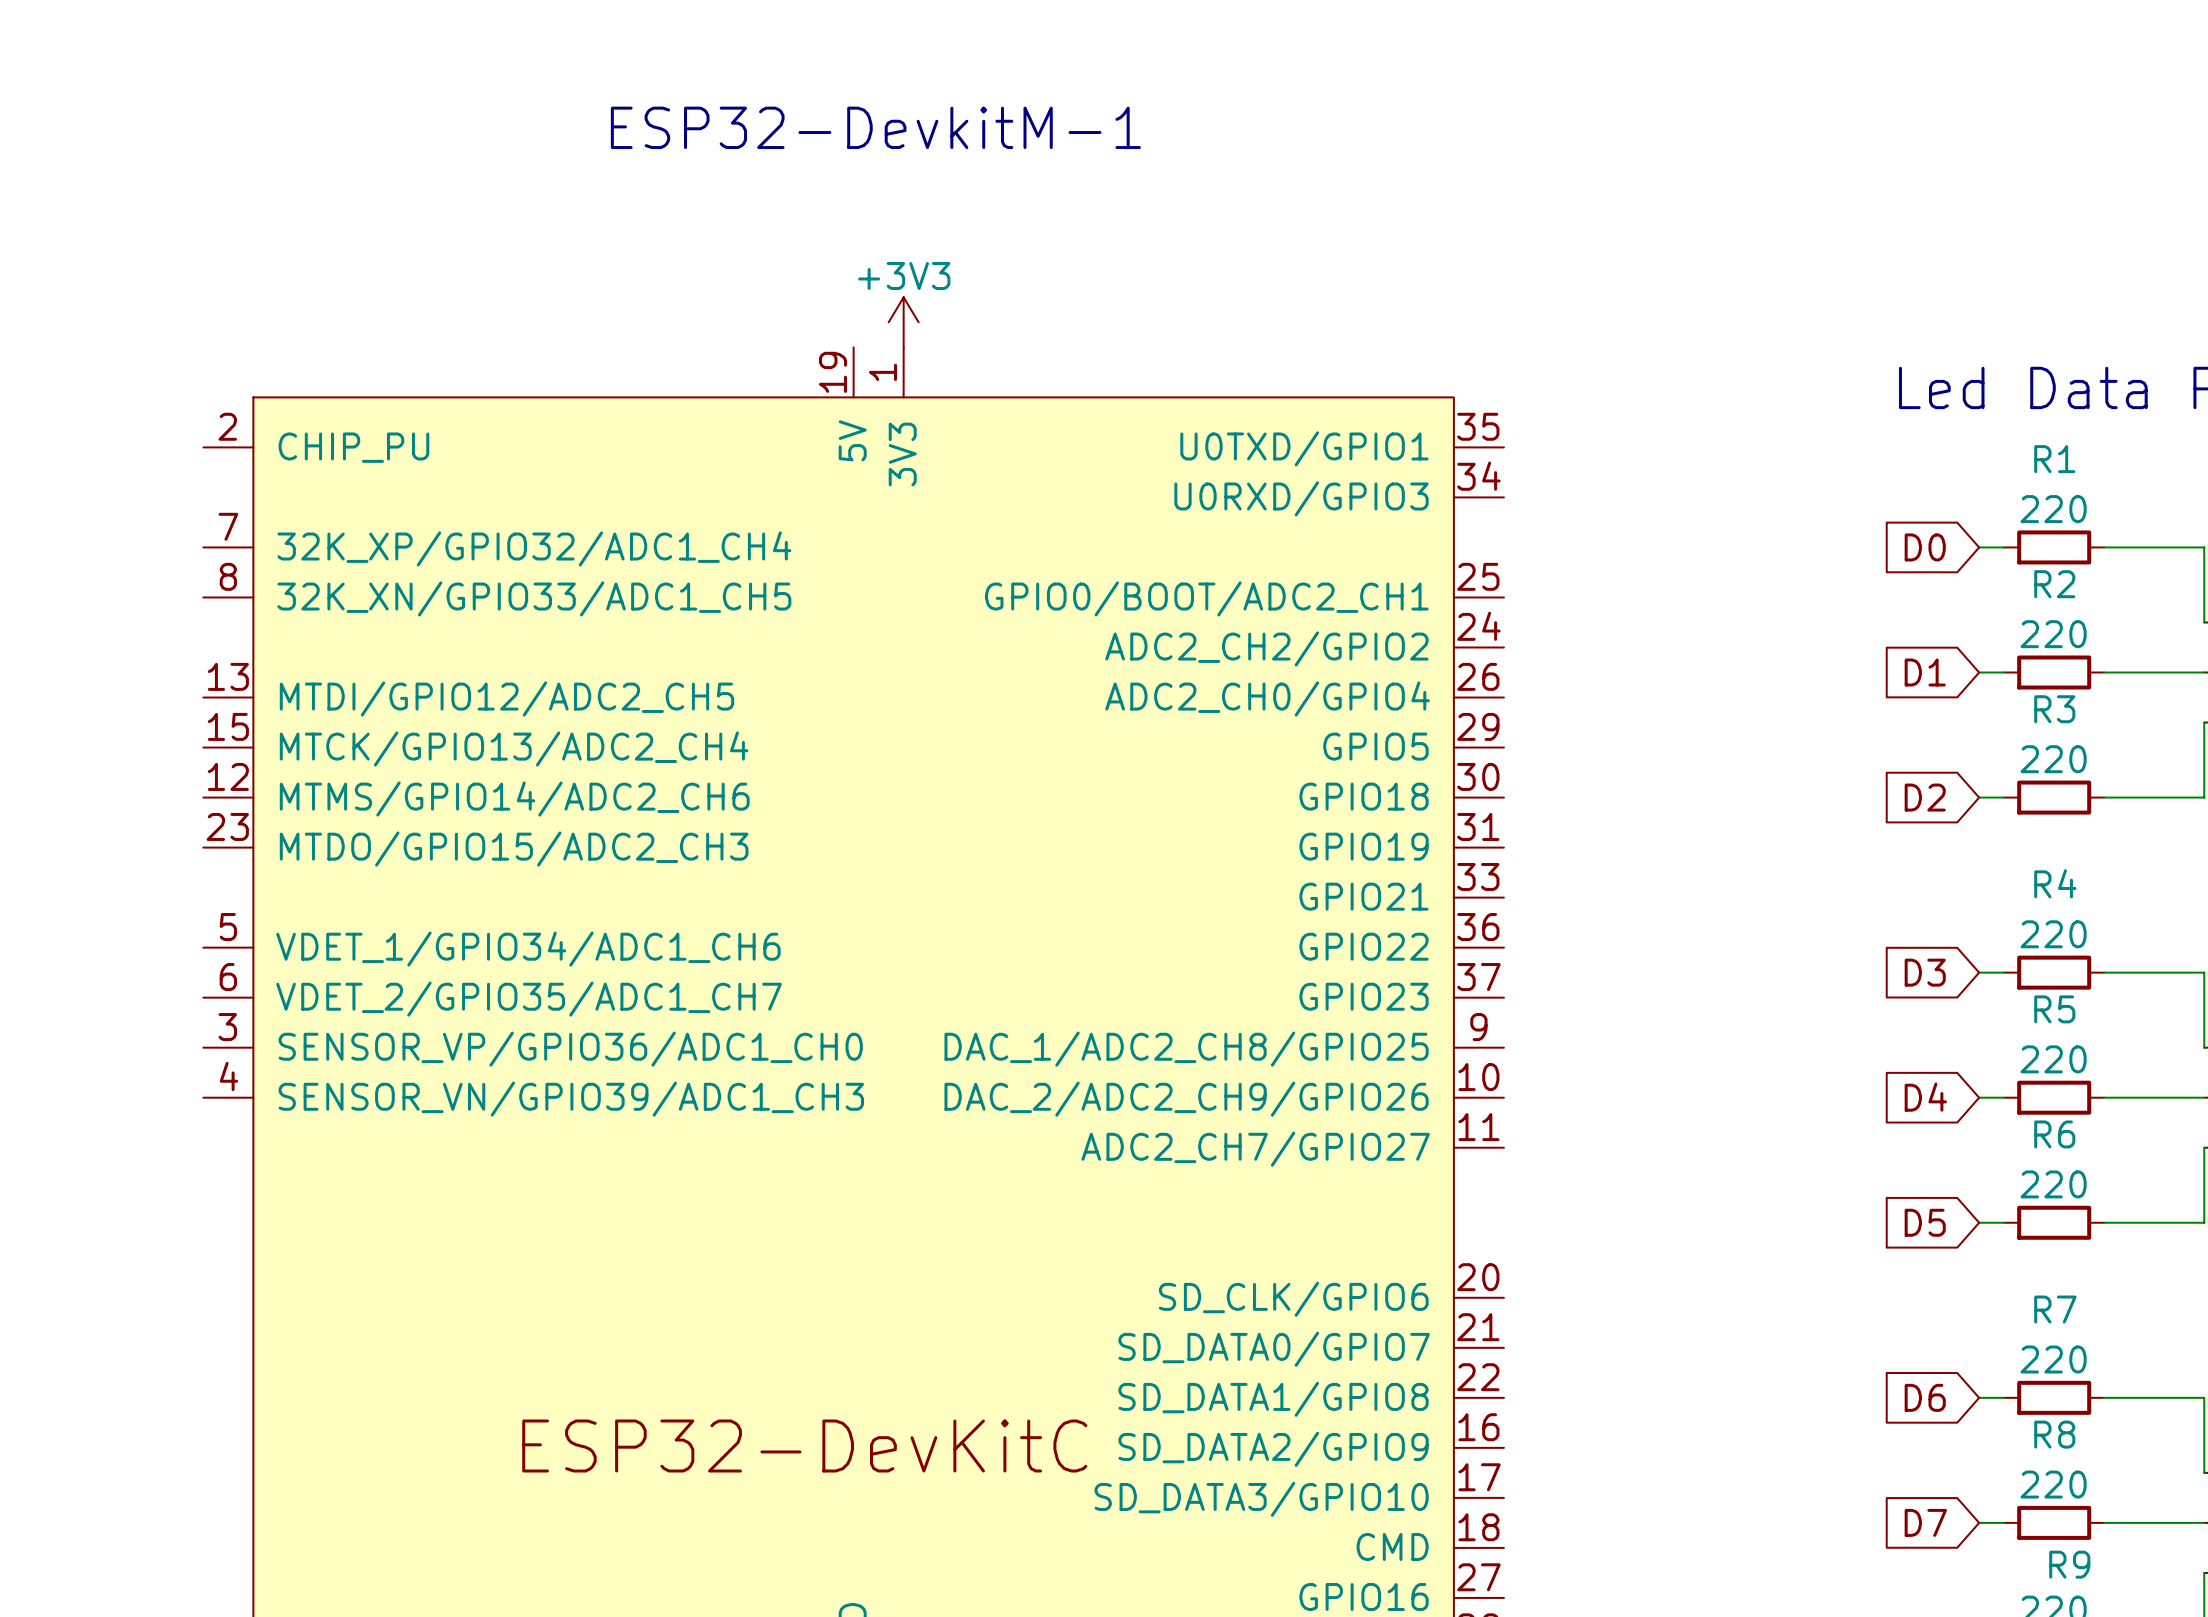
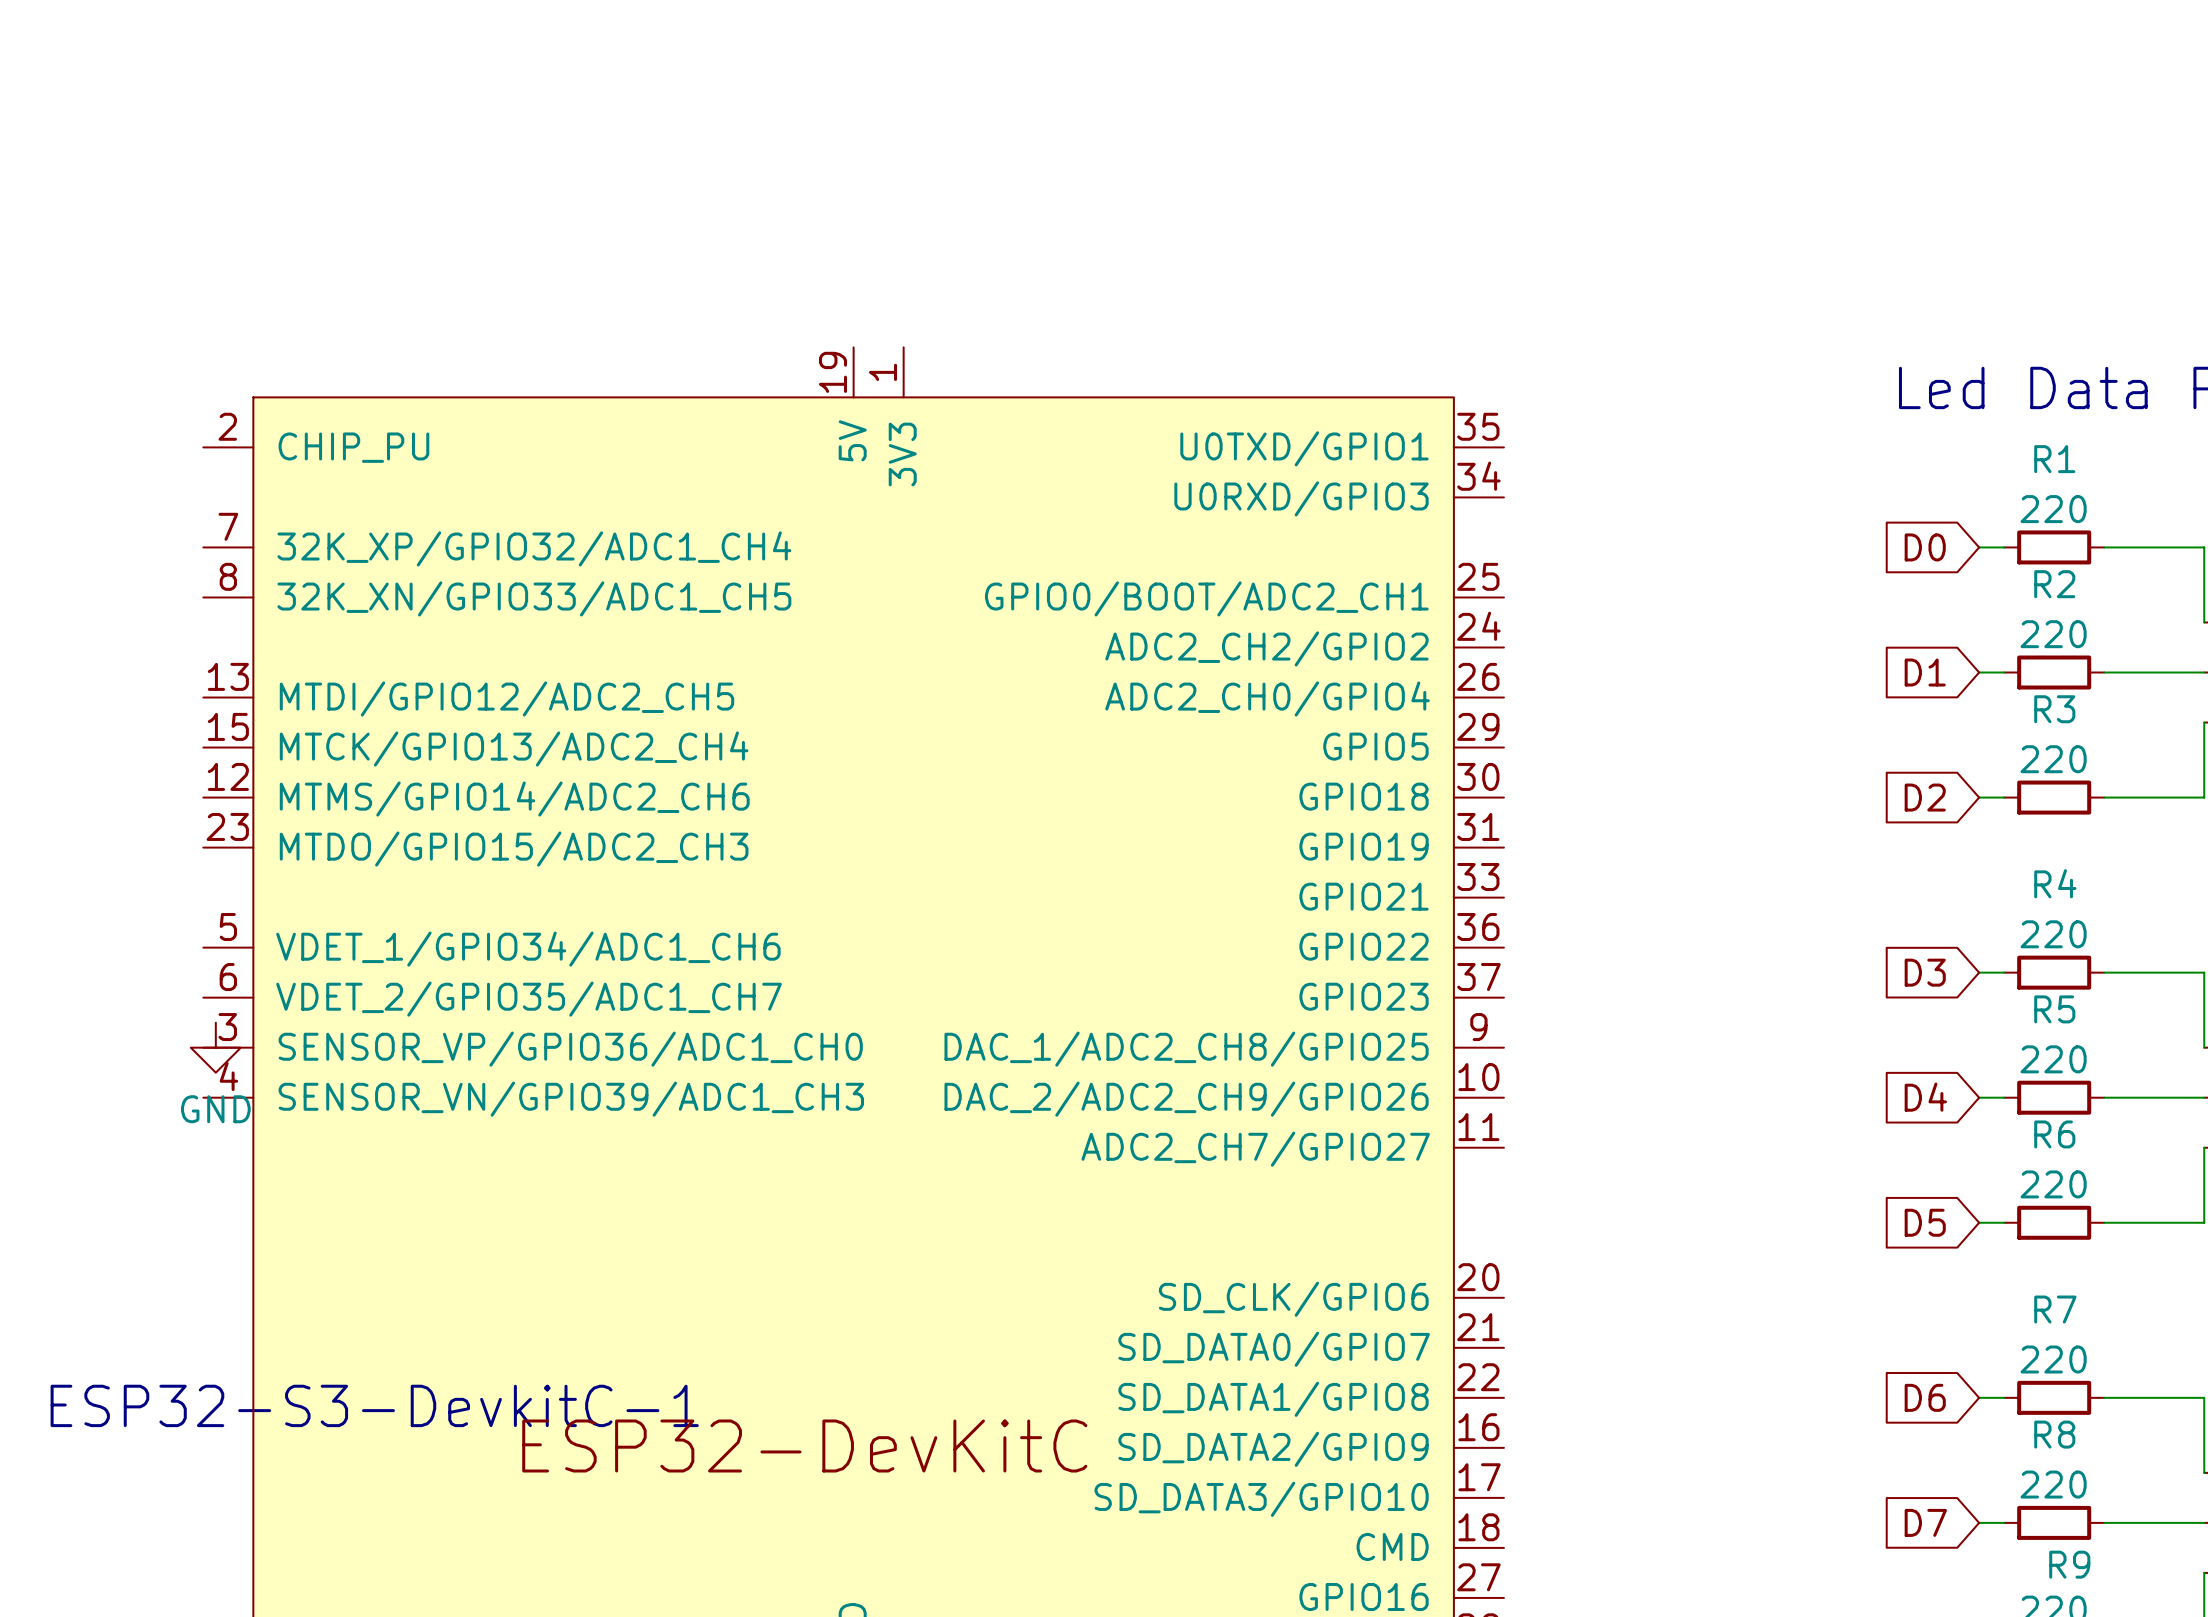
text: ESP32-DevkitM-1 (875, 127) -> none
power symbol: +3V3 (903, 322) -> none
power symbol: none -> GND (215, 1047)
text: none -> ESP32-S3-DevkitC-1 (374, 1405)

